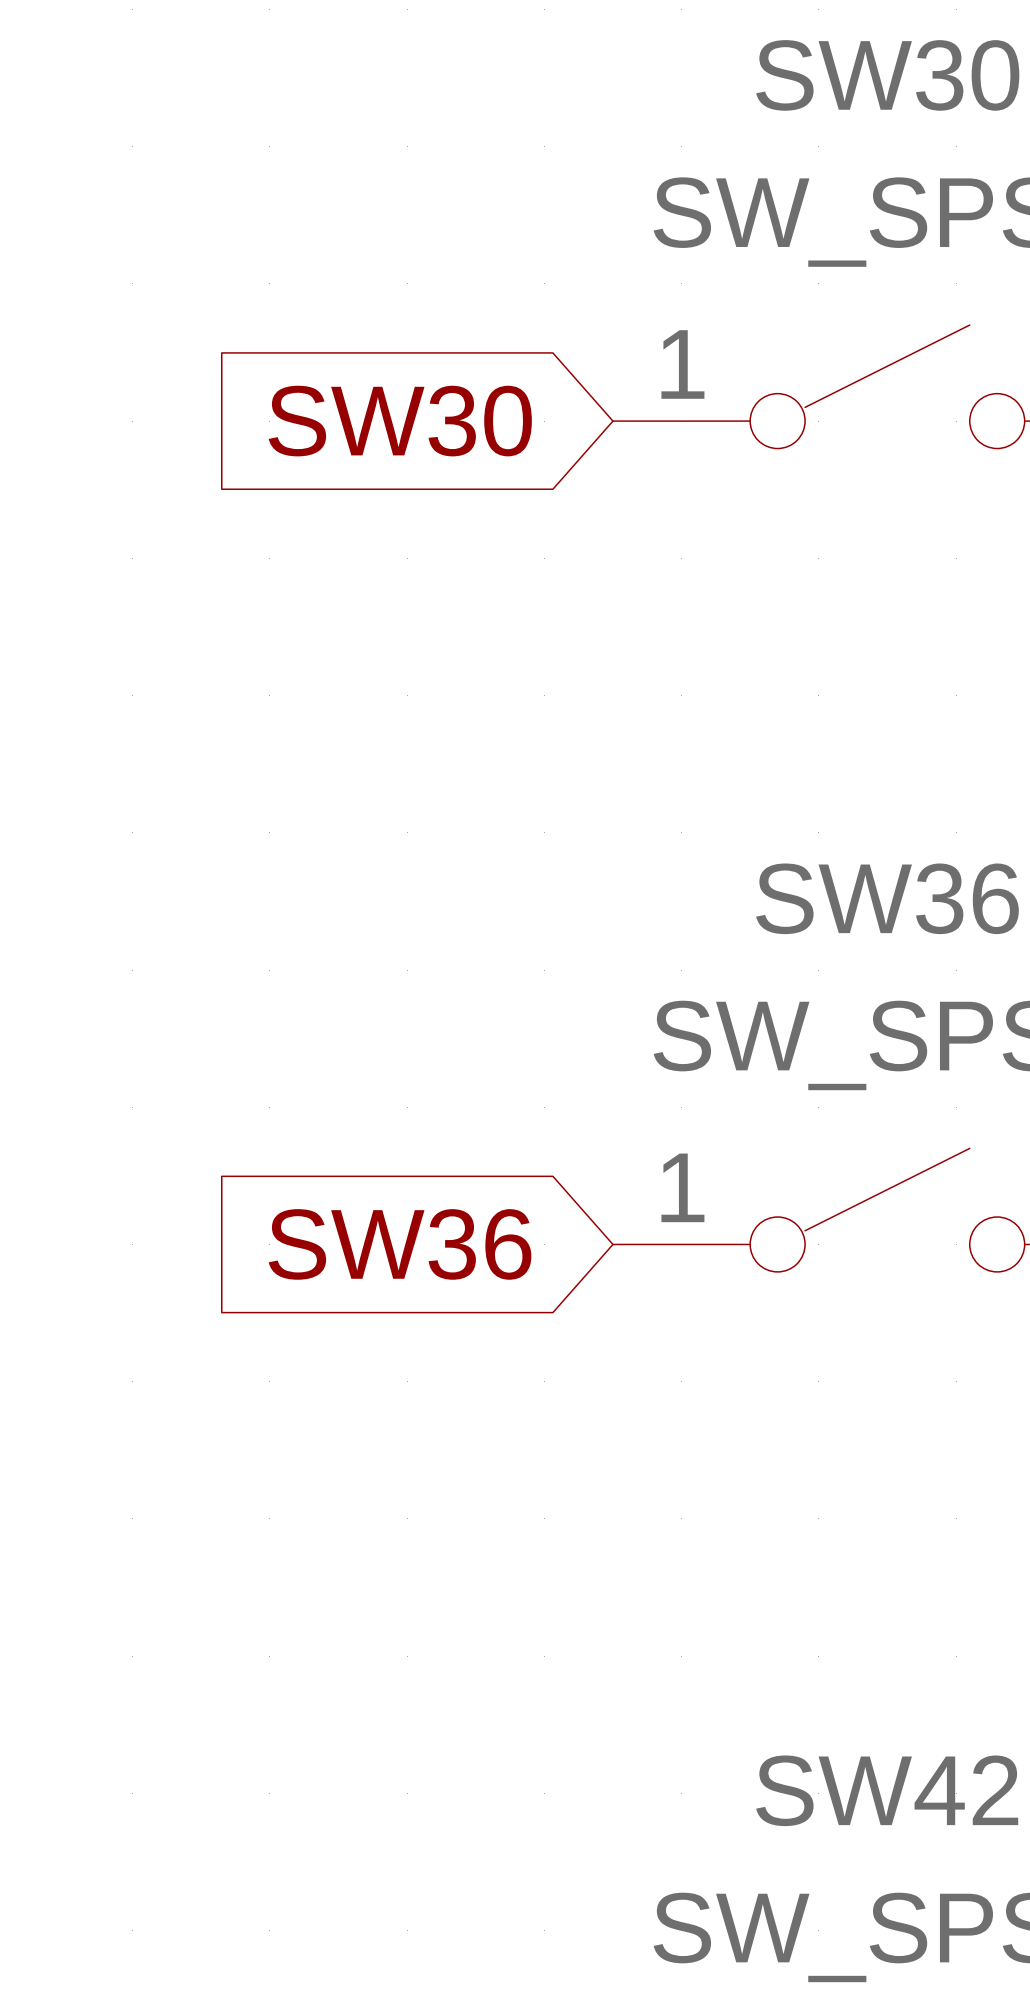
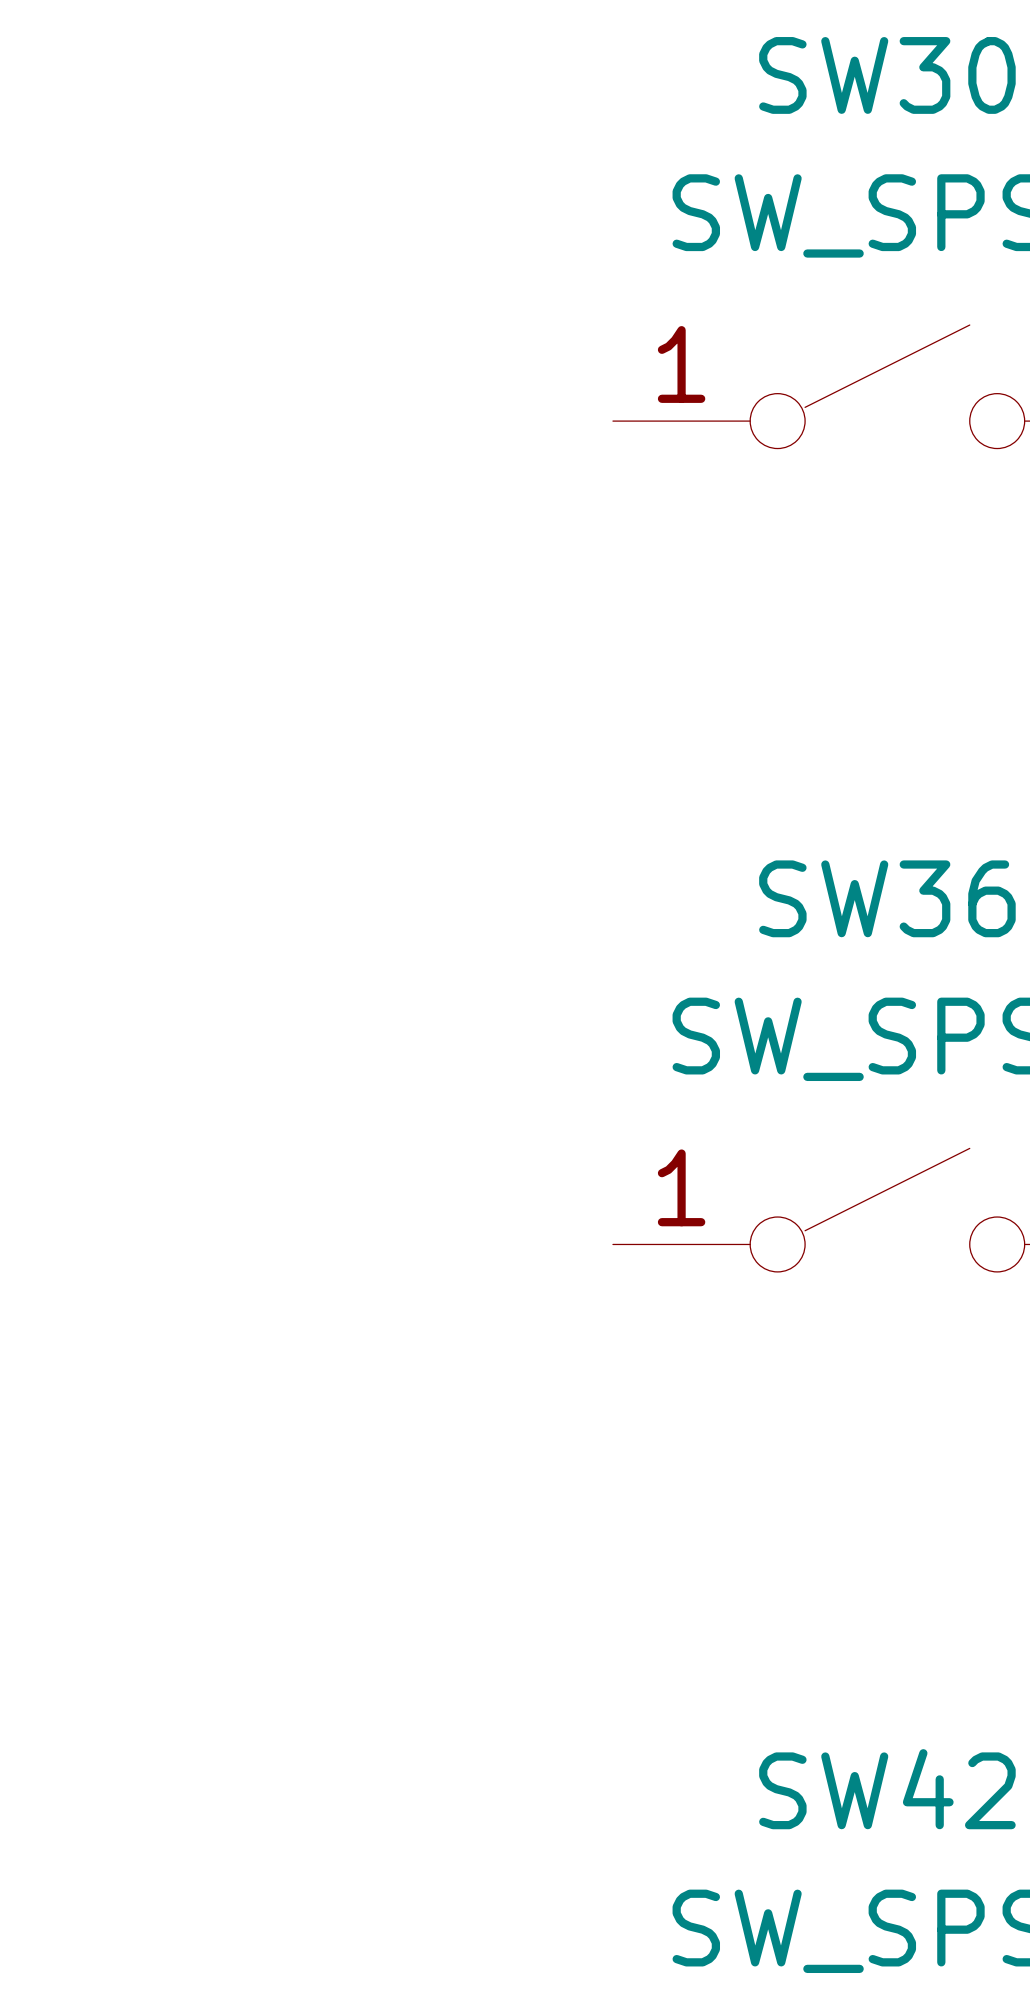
global label: SW30 (400, 421) -> none
global label: SW36 (400, 1244) -> none

